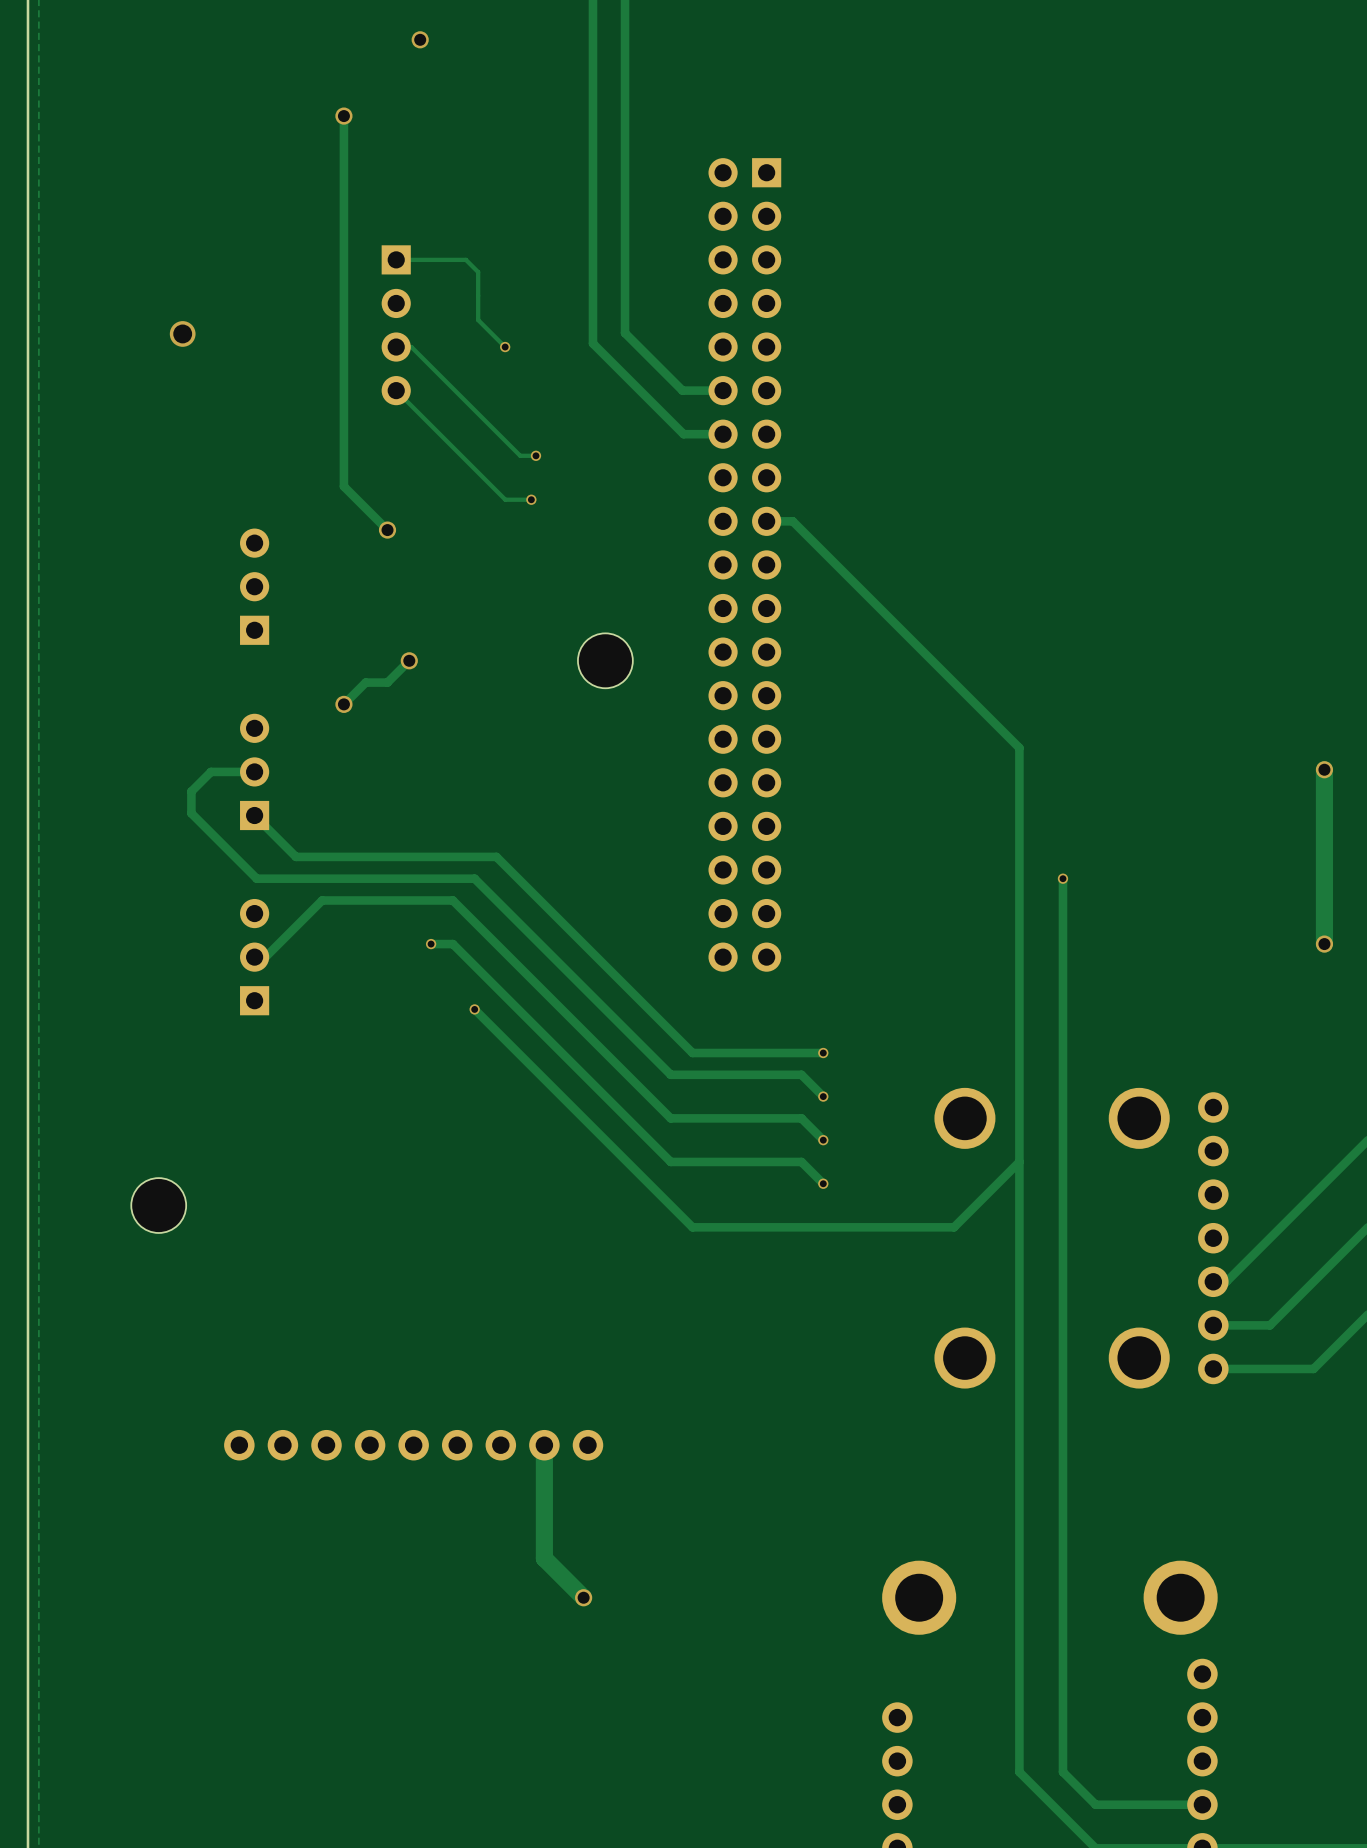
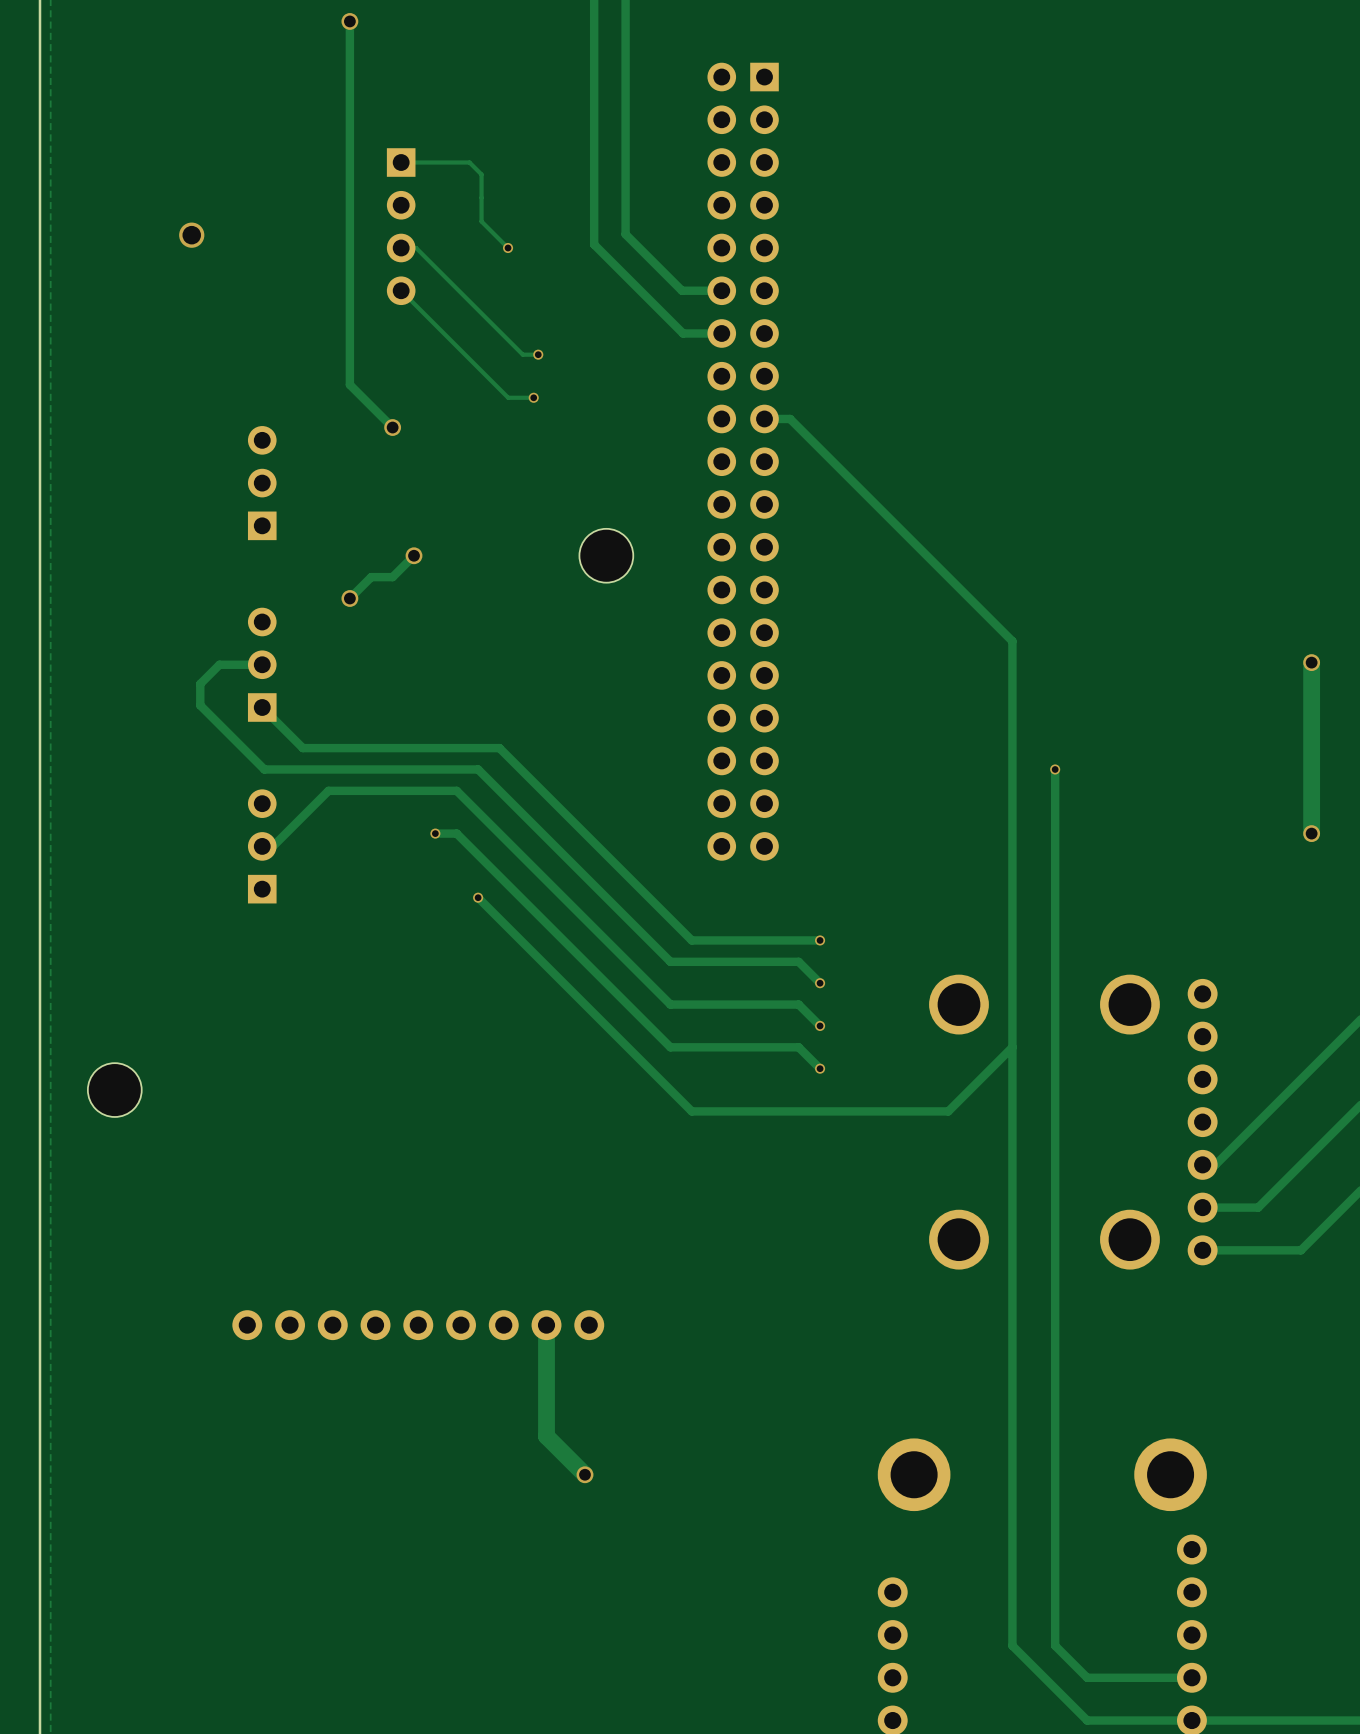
part position: (158, 1205) -> (114, 1090)

